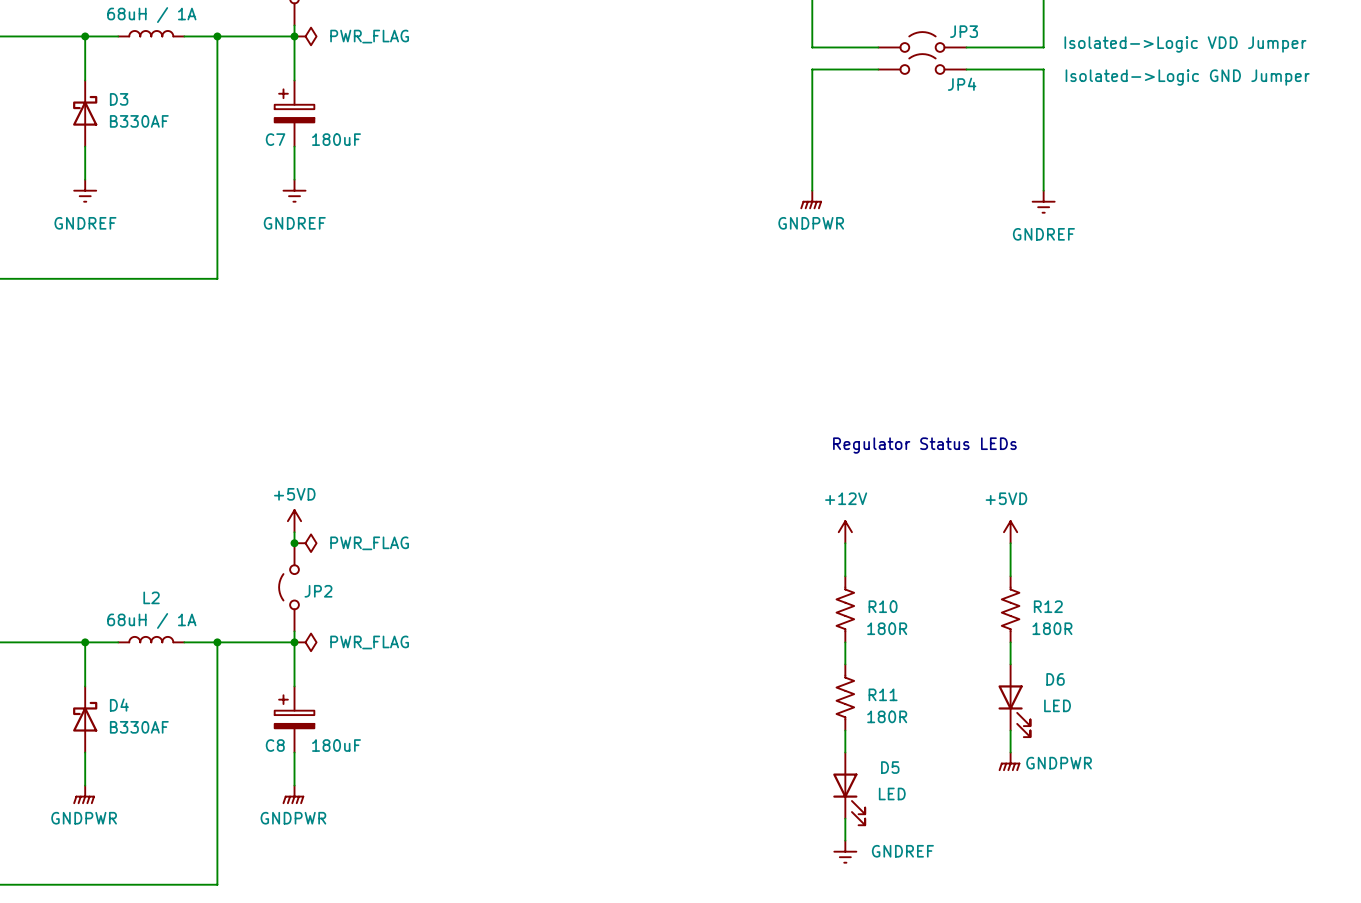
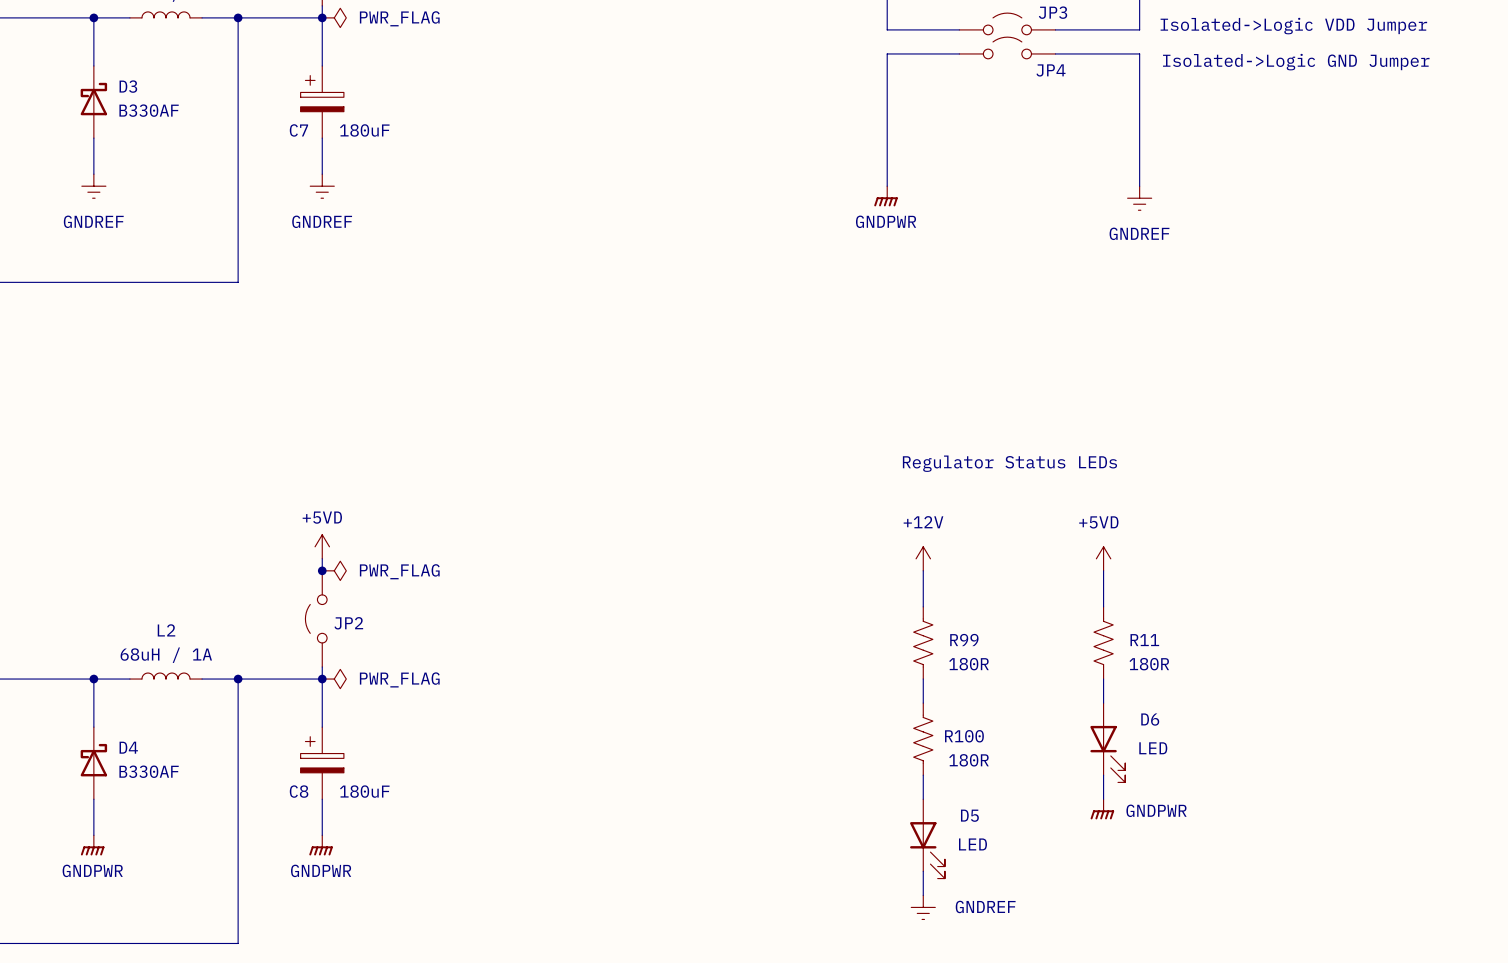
R10 name: R10 (883, 606) -> R99 (964, 640)
R12 name: R12 (1048, 606) -> R11 (1144, 640)
R11 name: R11 (883, 694) -> R100 (964, 736)

